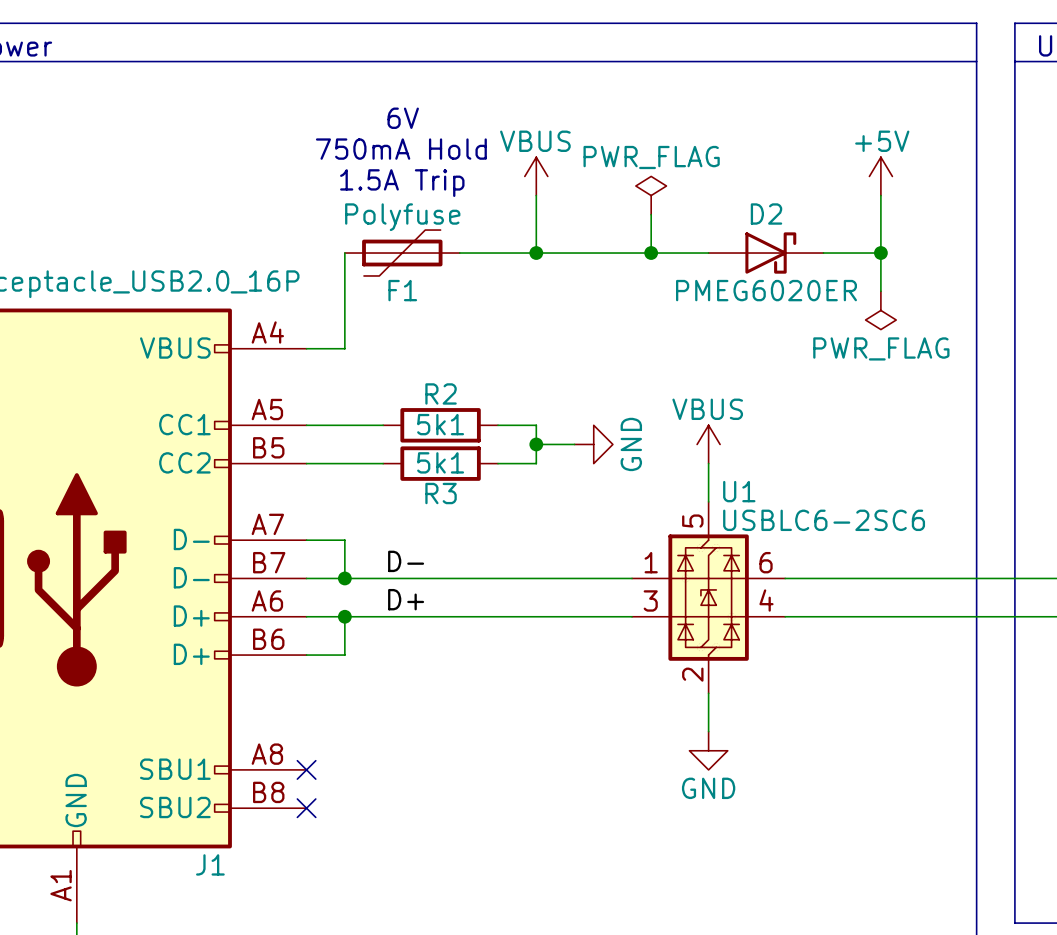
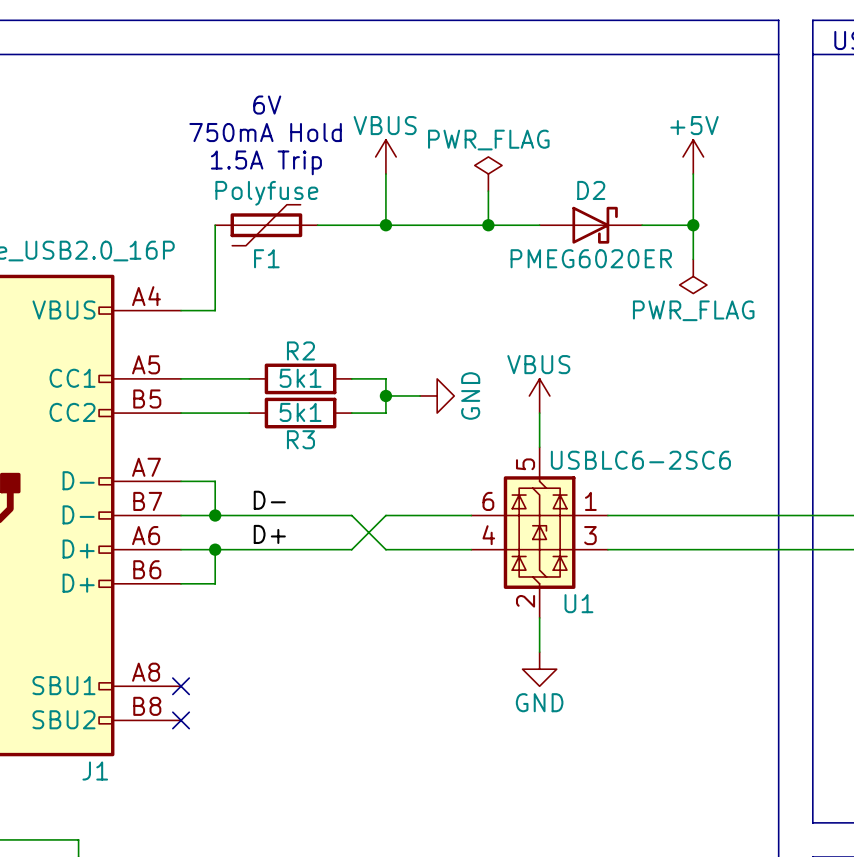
U1 name position: U1 (739, 491) -> U1 (578, 603)
wire: (498, 578) (536, 578) -> (351, 515) (385, 549)
U1 flip: as is (708, 597) -> left-right (539, 532)
wire: (498, 616) (536, 616) -> (351, 549) (385, 515)

